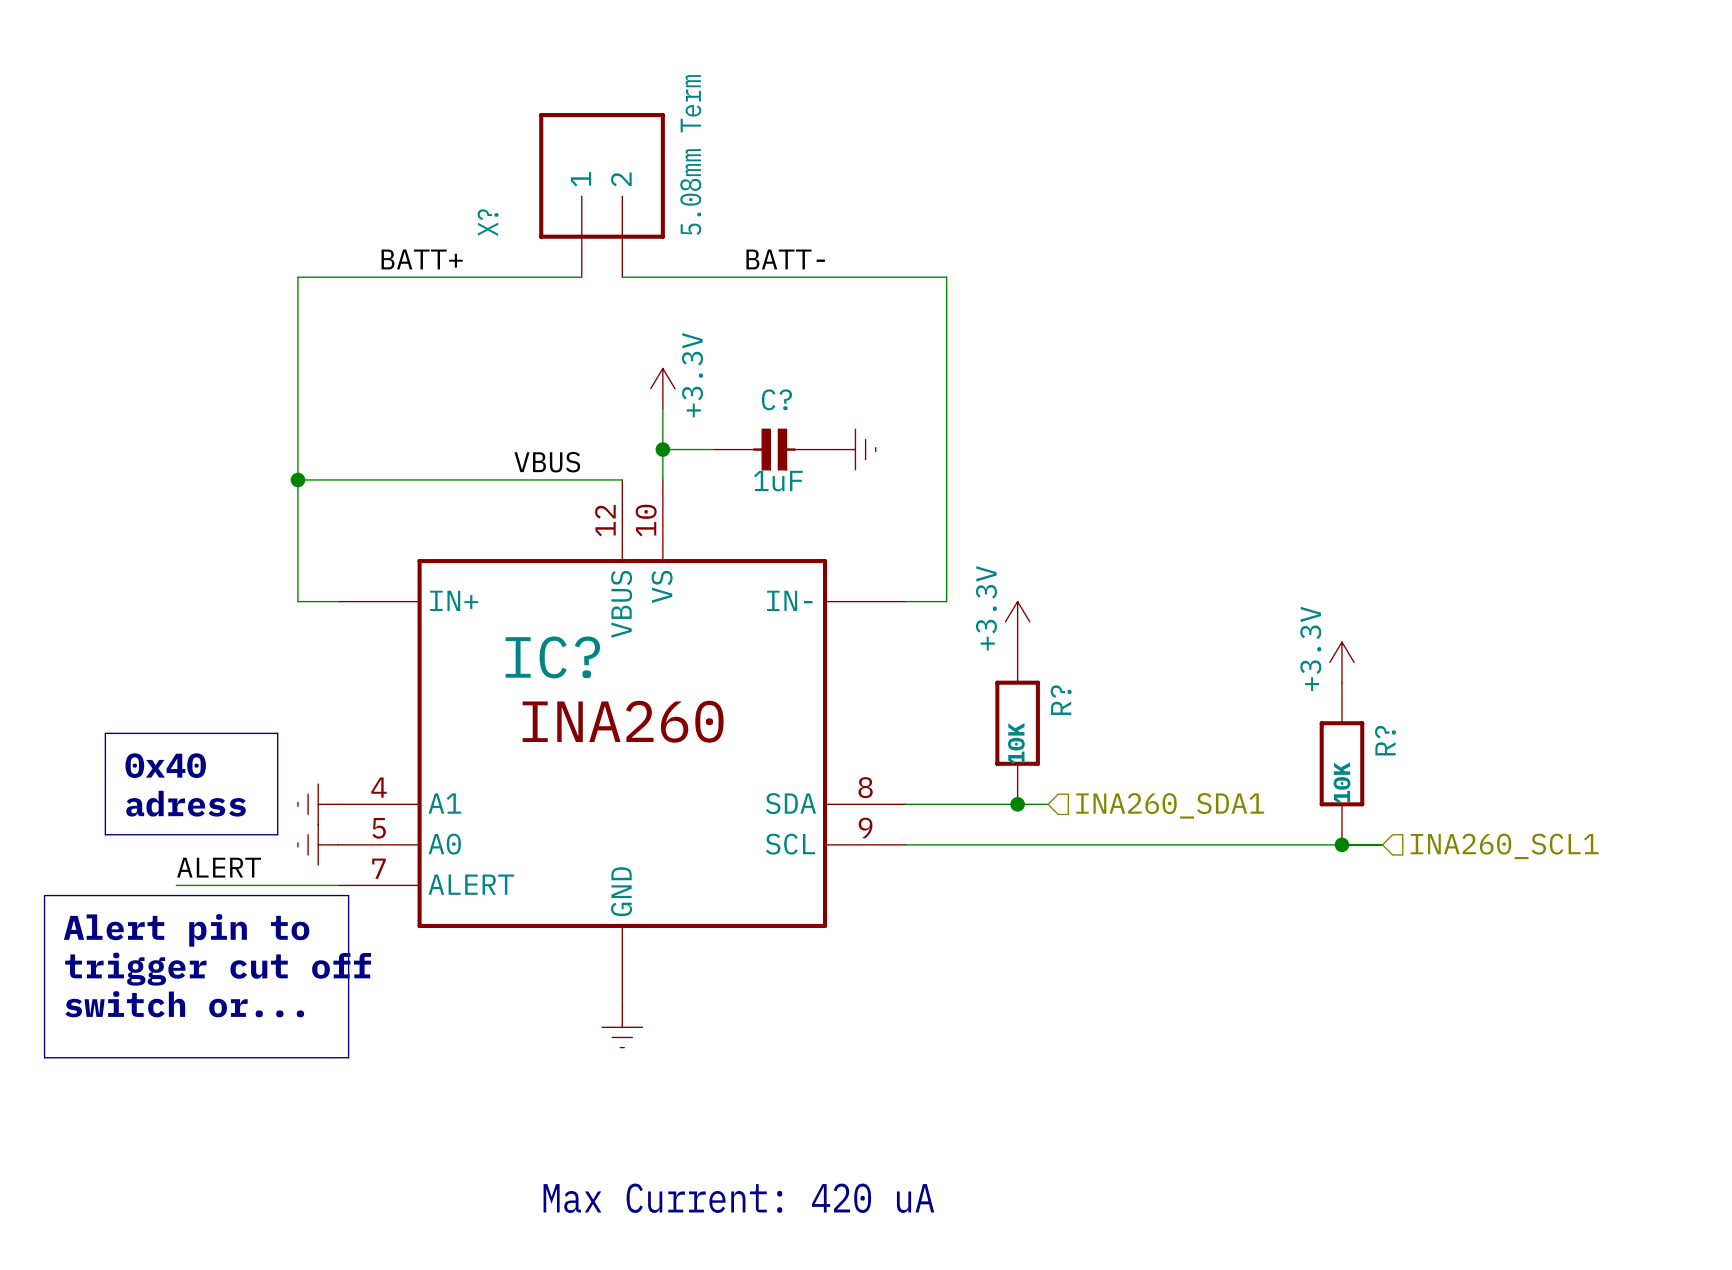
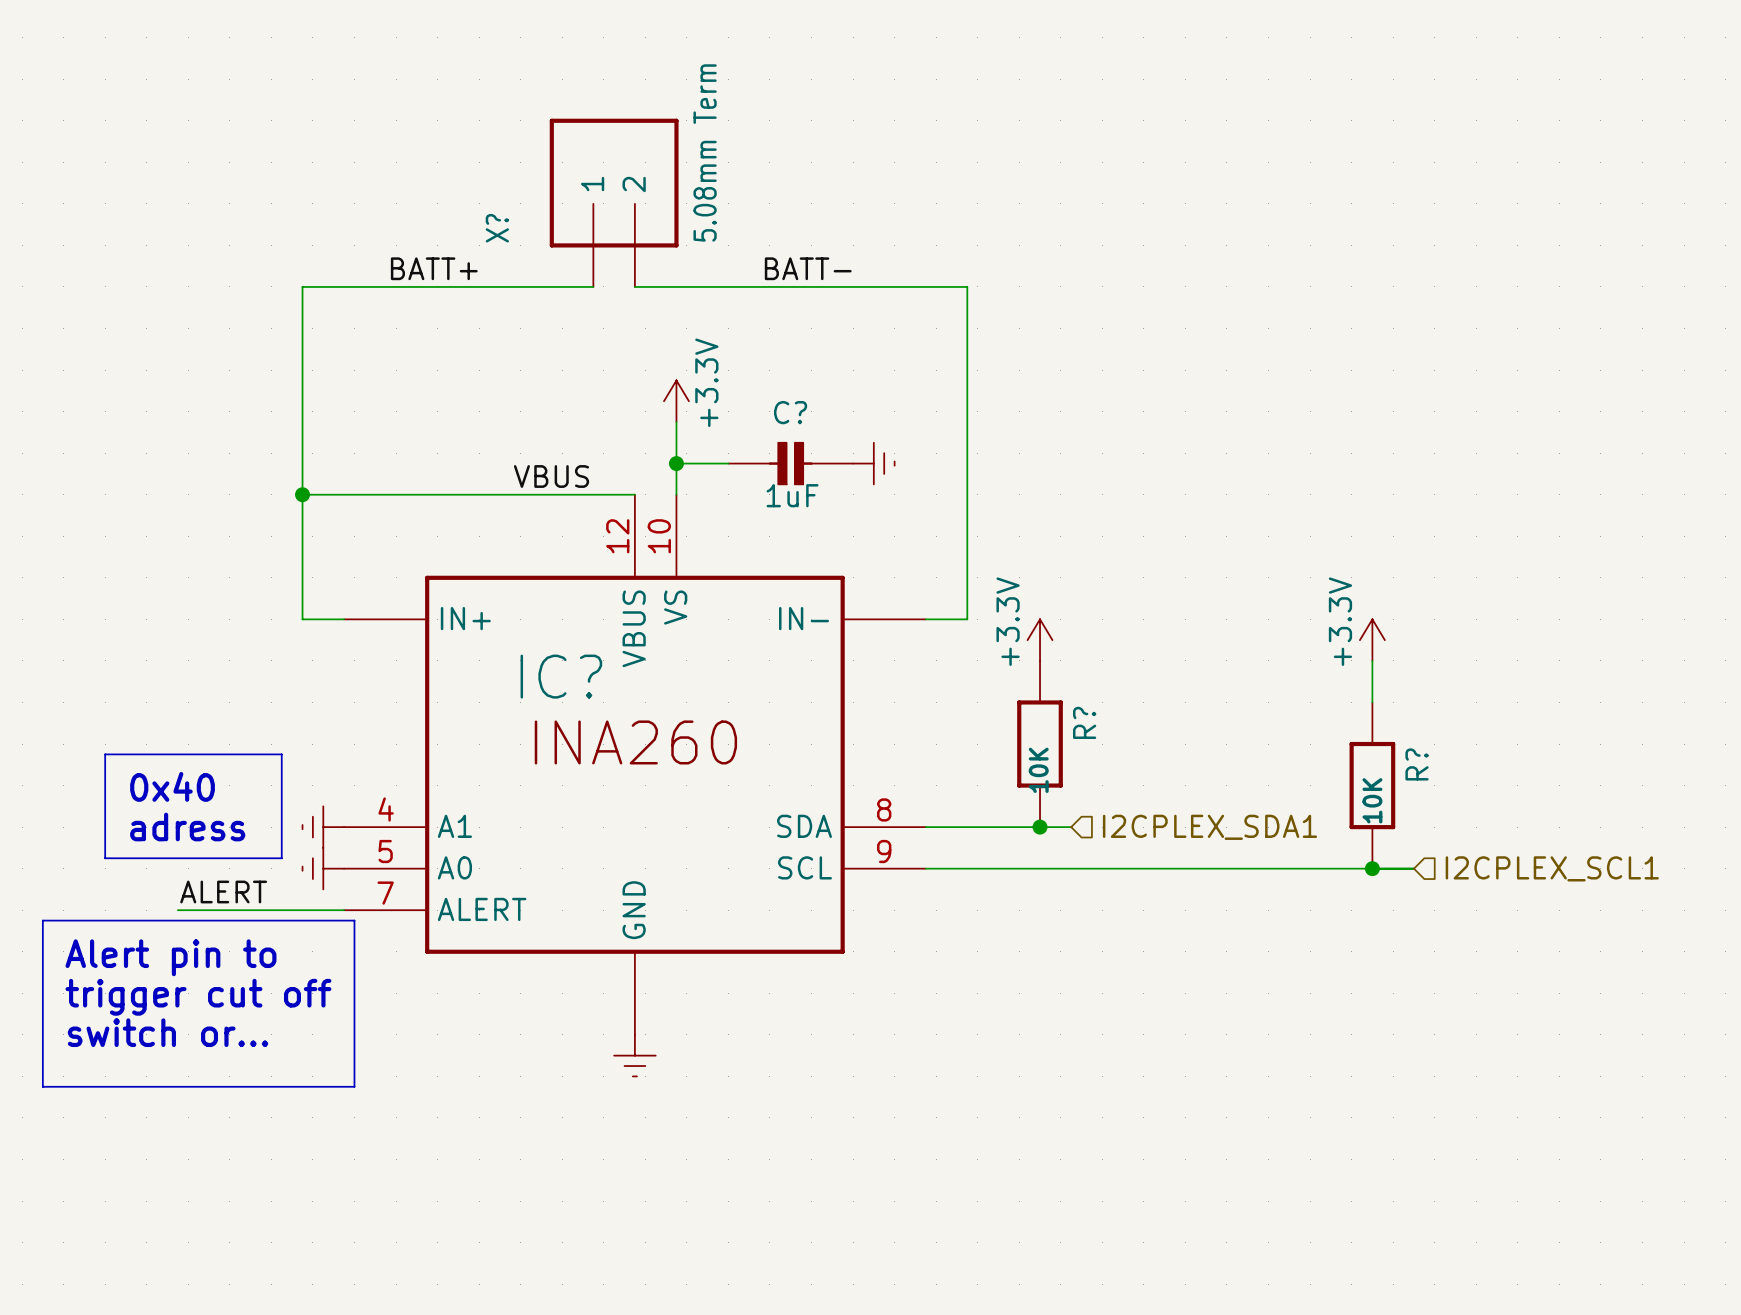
power symbol position: +3.3V (1341, 662) -> +3.3V (1372, 640)
hierarchical label: INA260_SDA1 (1170, 805) -> I2CPLEX_SDA1 (1209, 827)
hierarchical label: INA260_SCL1 (1504, 846) -> I2CPLEX_SCL1 (1552, 868)
text: Max Current: 420 uA (738, 1198) -> none

